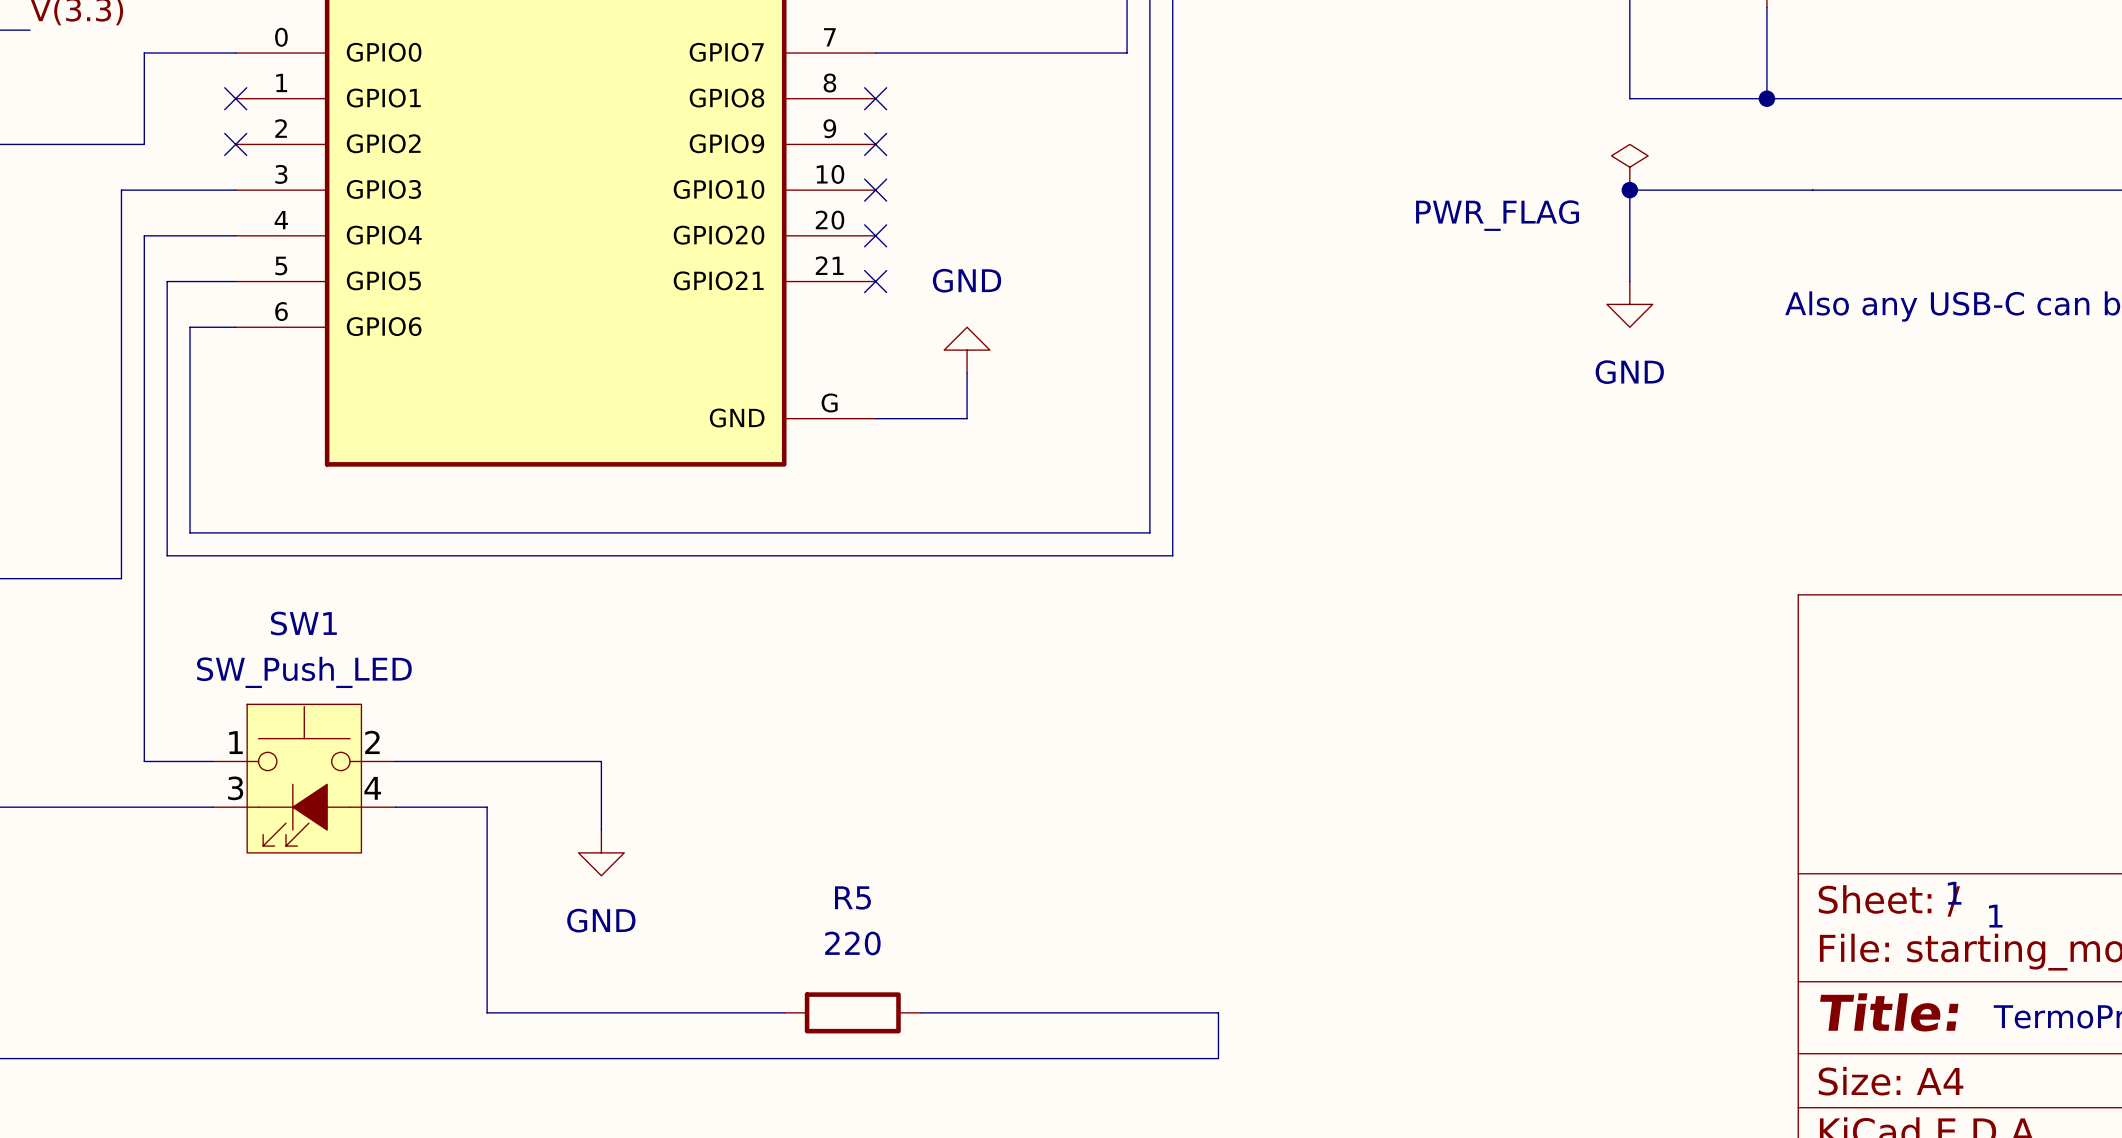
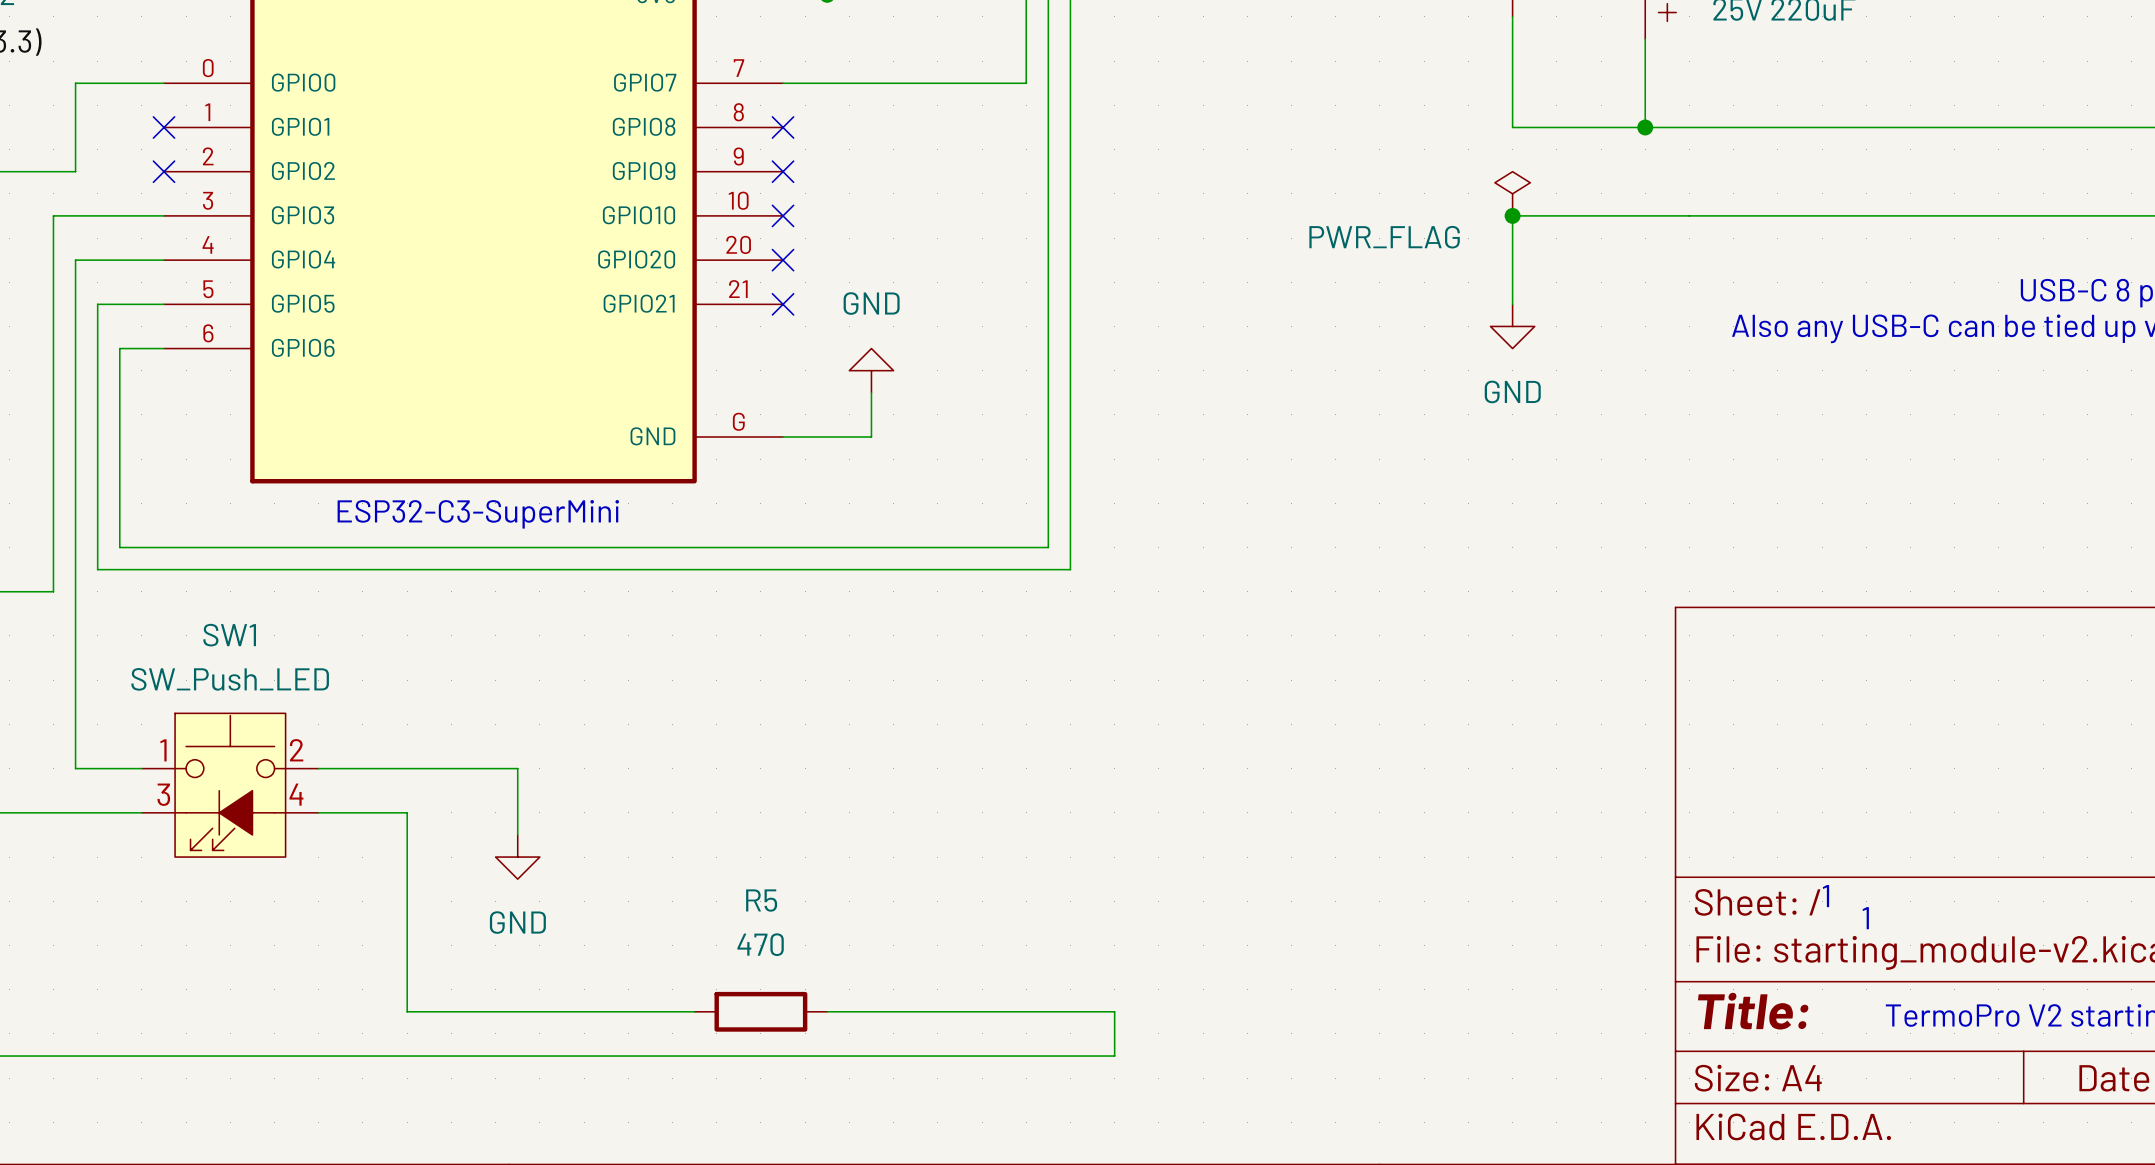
text: none -> ESP32-C3-SuperMini (478, 514)
R5 value: 220 (852, 943) -> 470 (760, 944)

